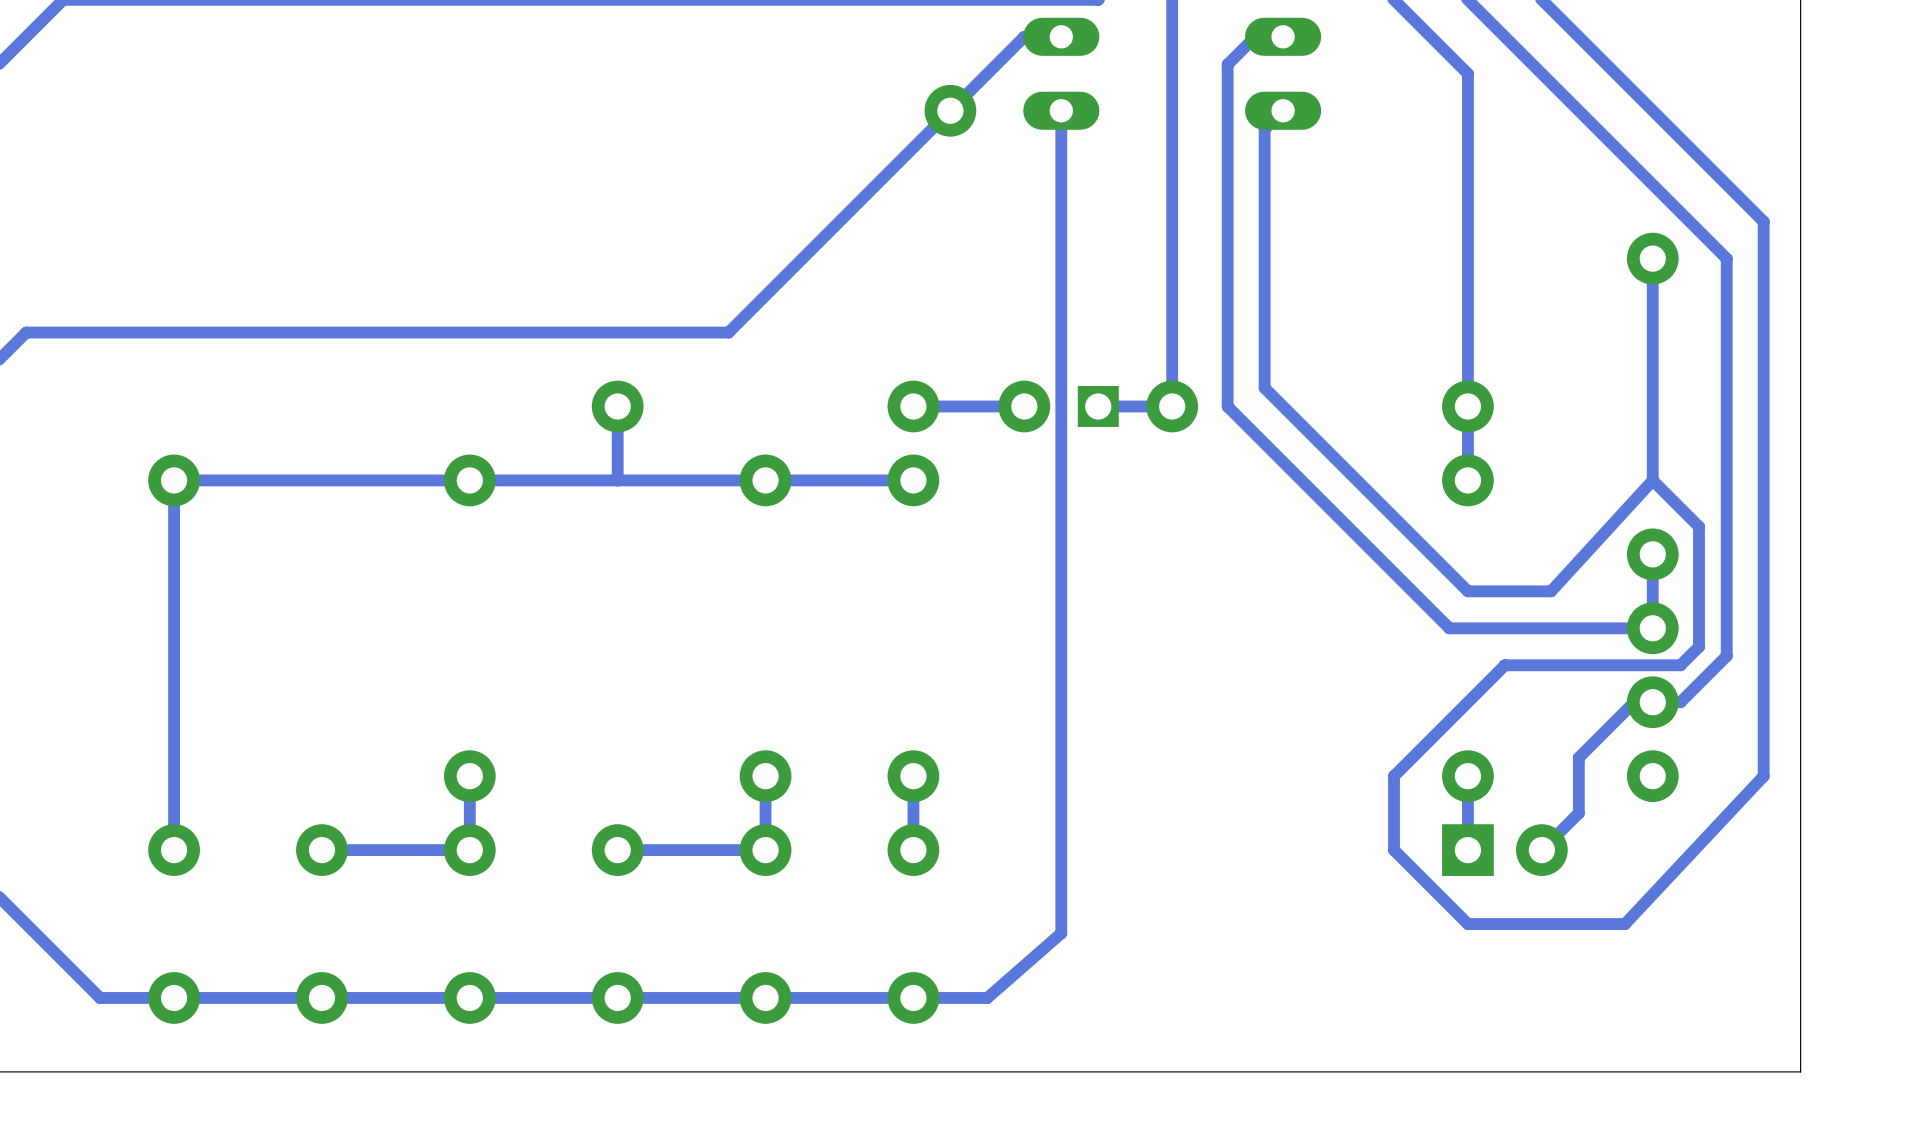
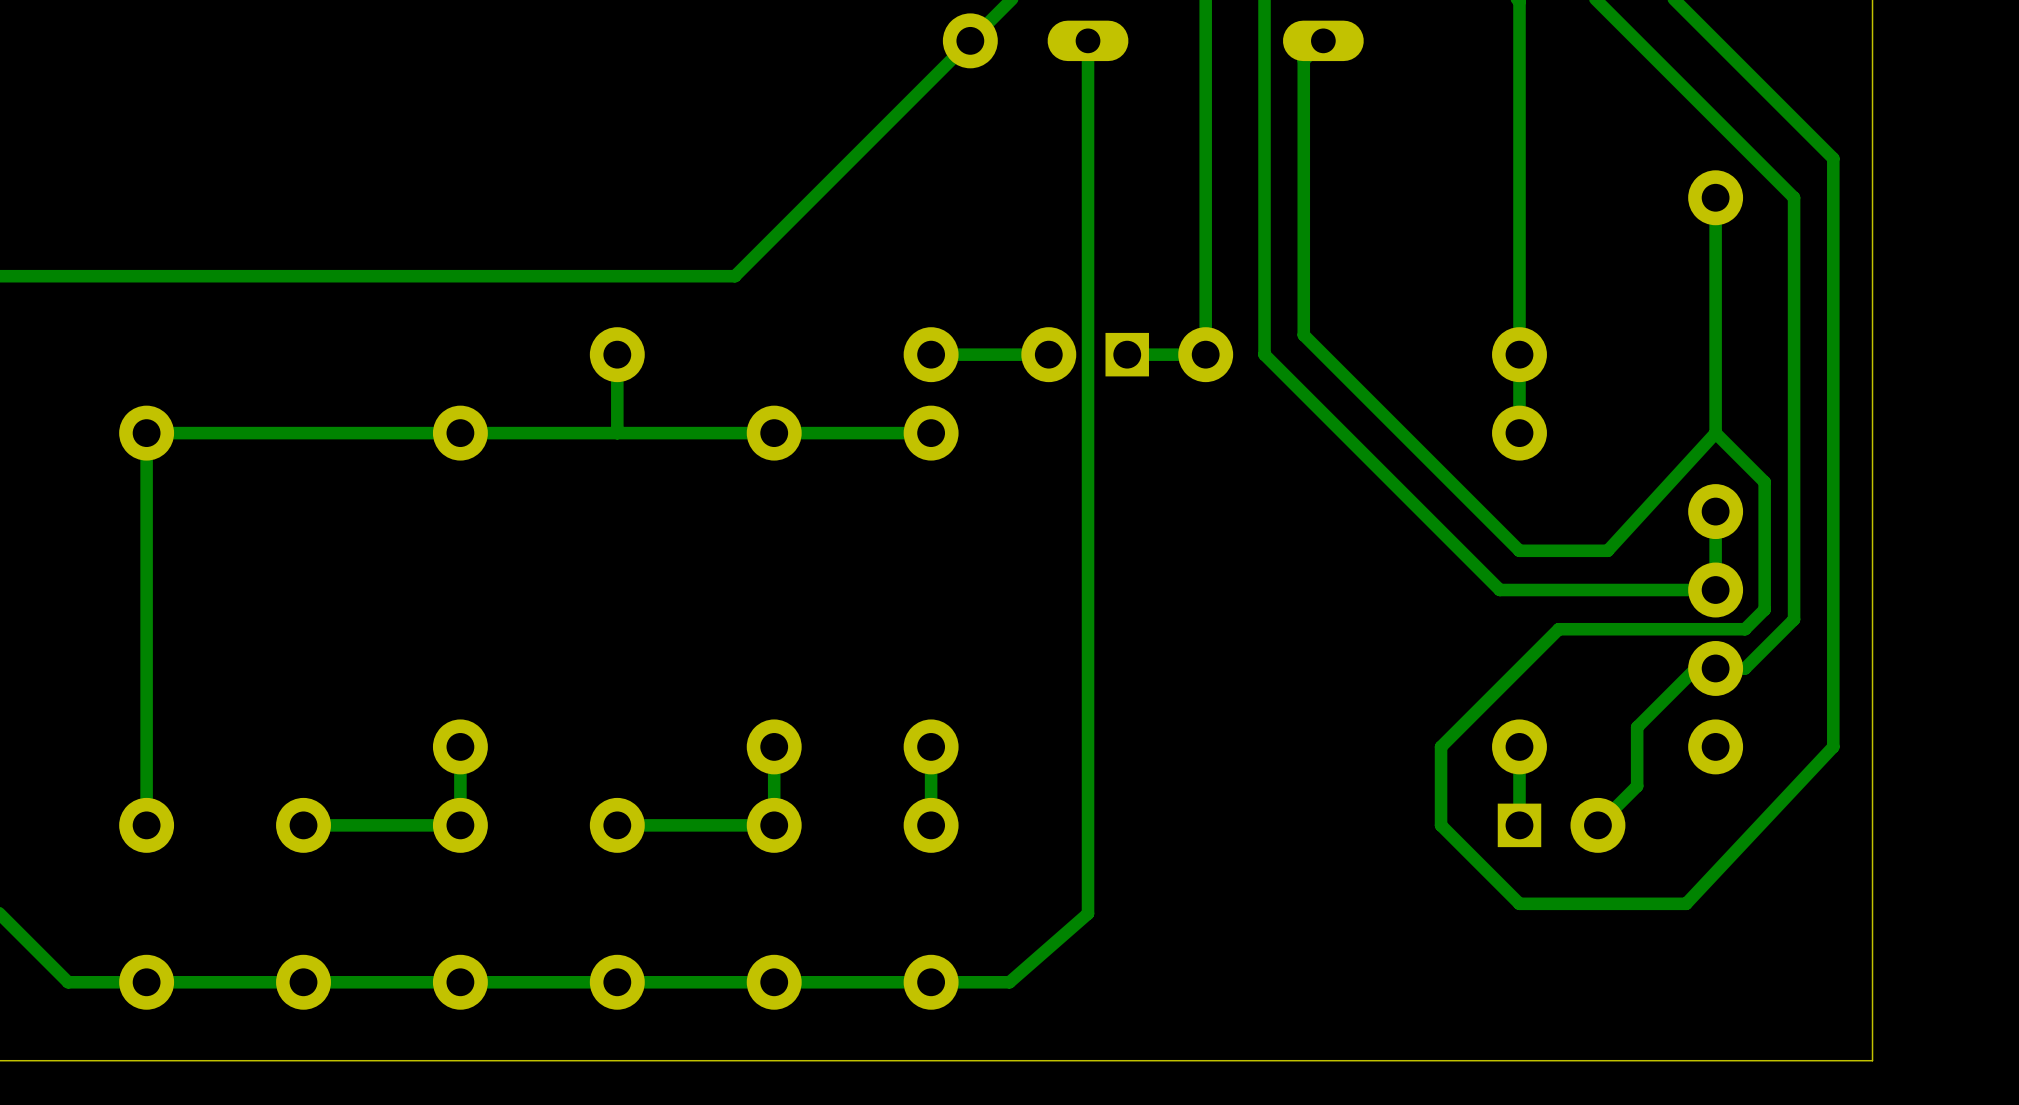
part footprint: [1442, 824, 1568, 876] -> [1497, 797, 1626, 853]

